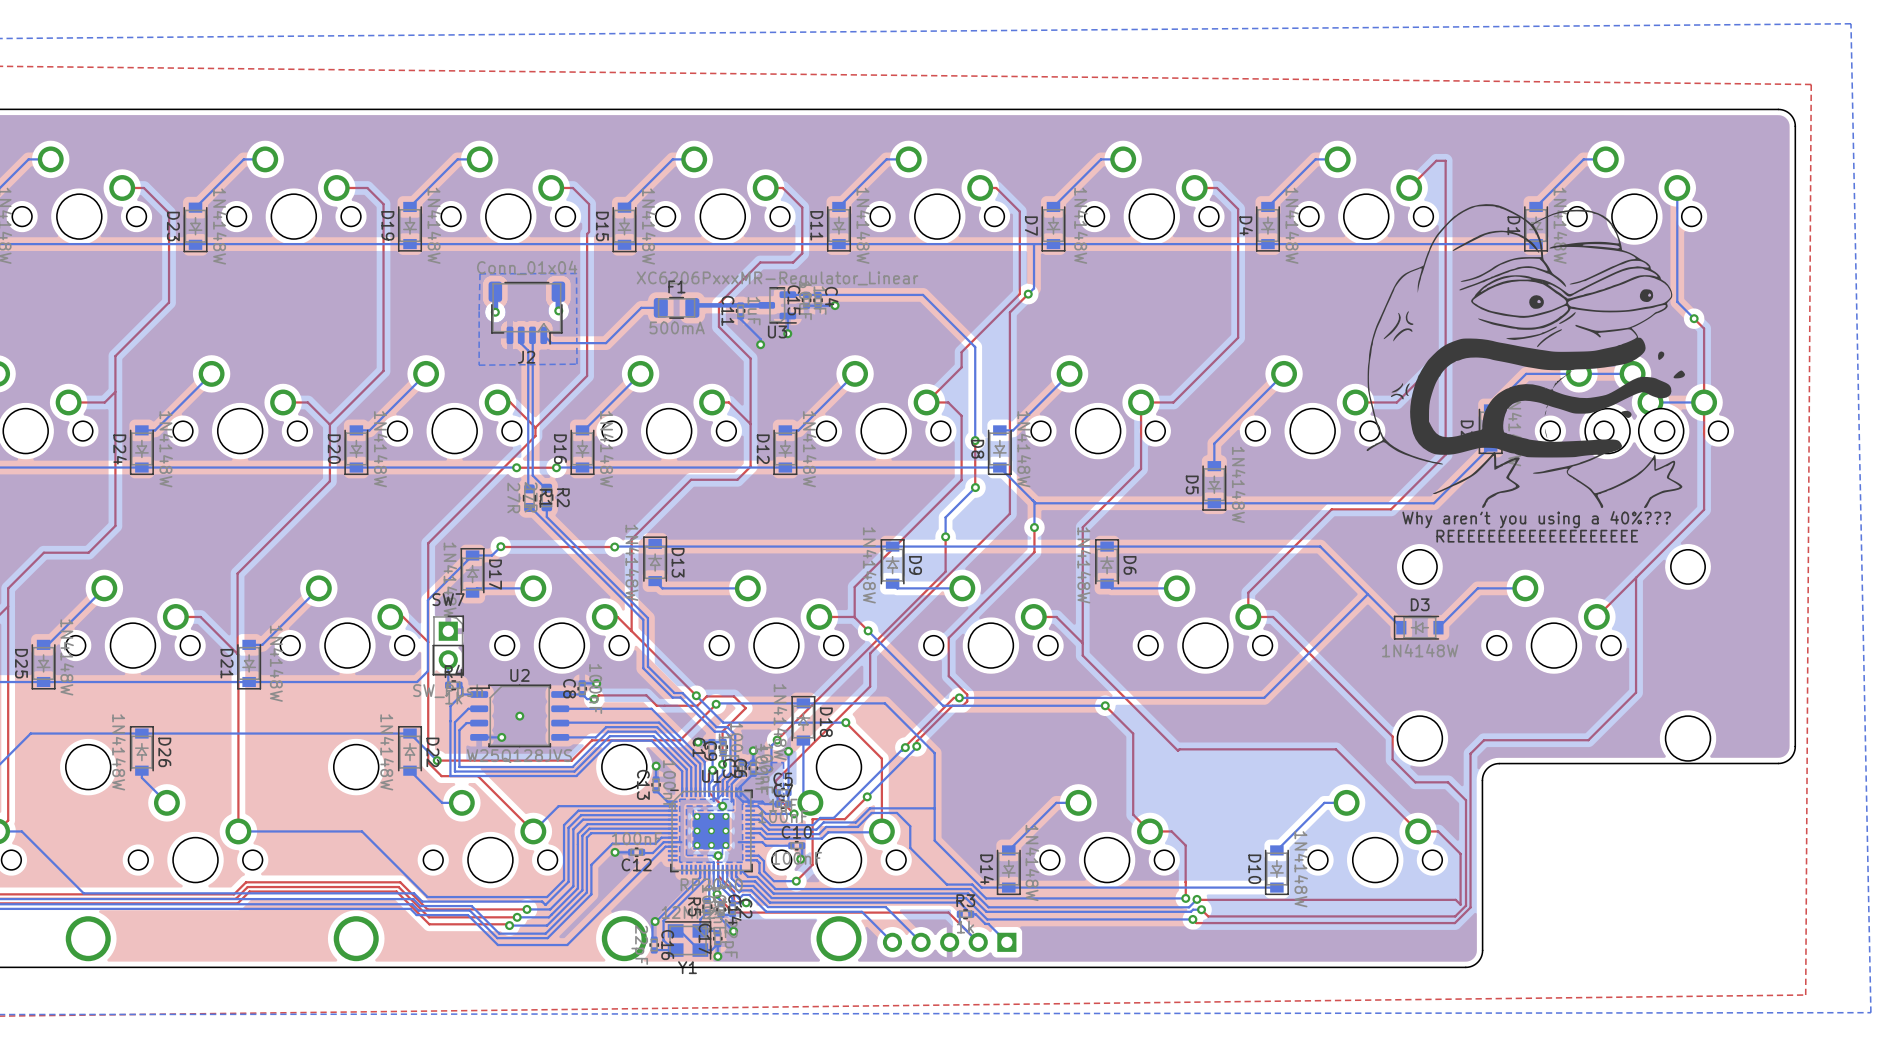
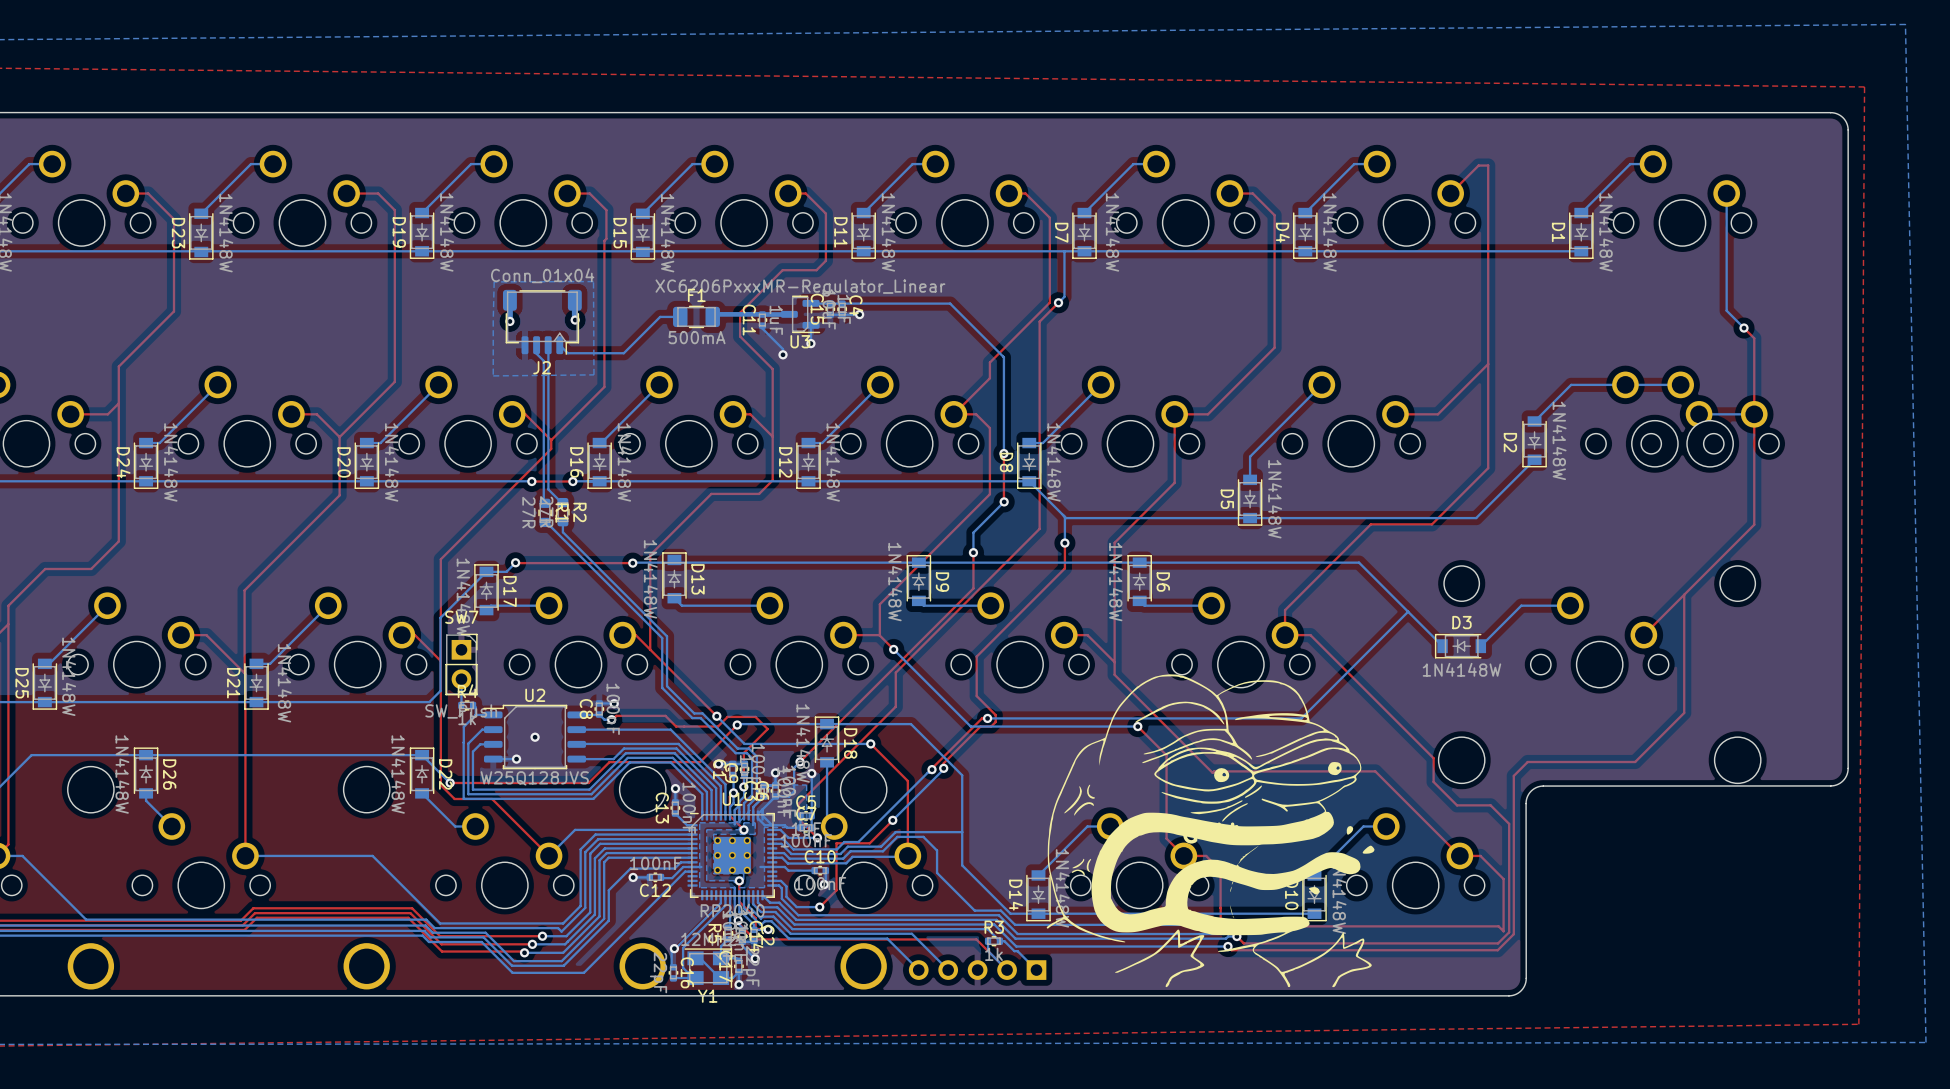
drawing: [1366, 204, 1686, 508] -> none
text: Why aren't you using a 40%??? (1536, 519) -> none
text: REEEEEEEEEEEEEEEEEEE (1537, 536) -> none
part: none -> (1210, 830)

